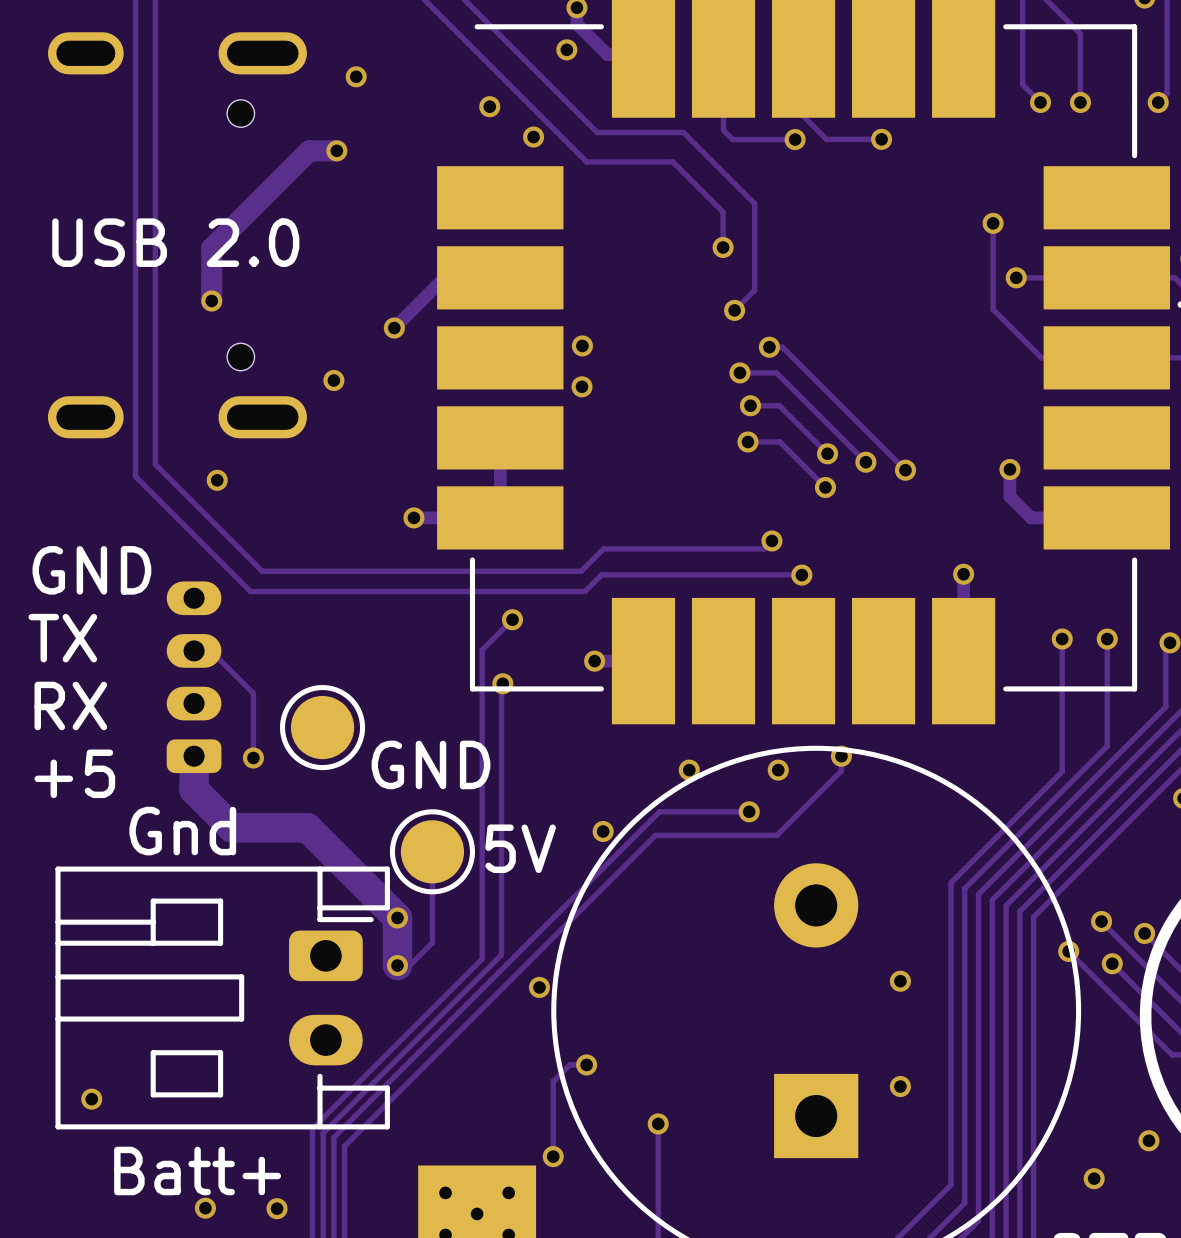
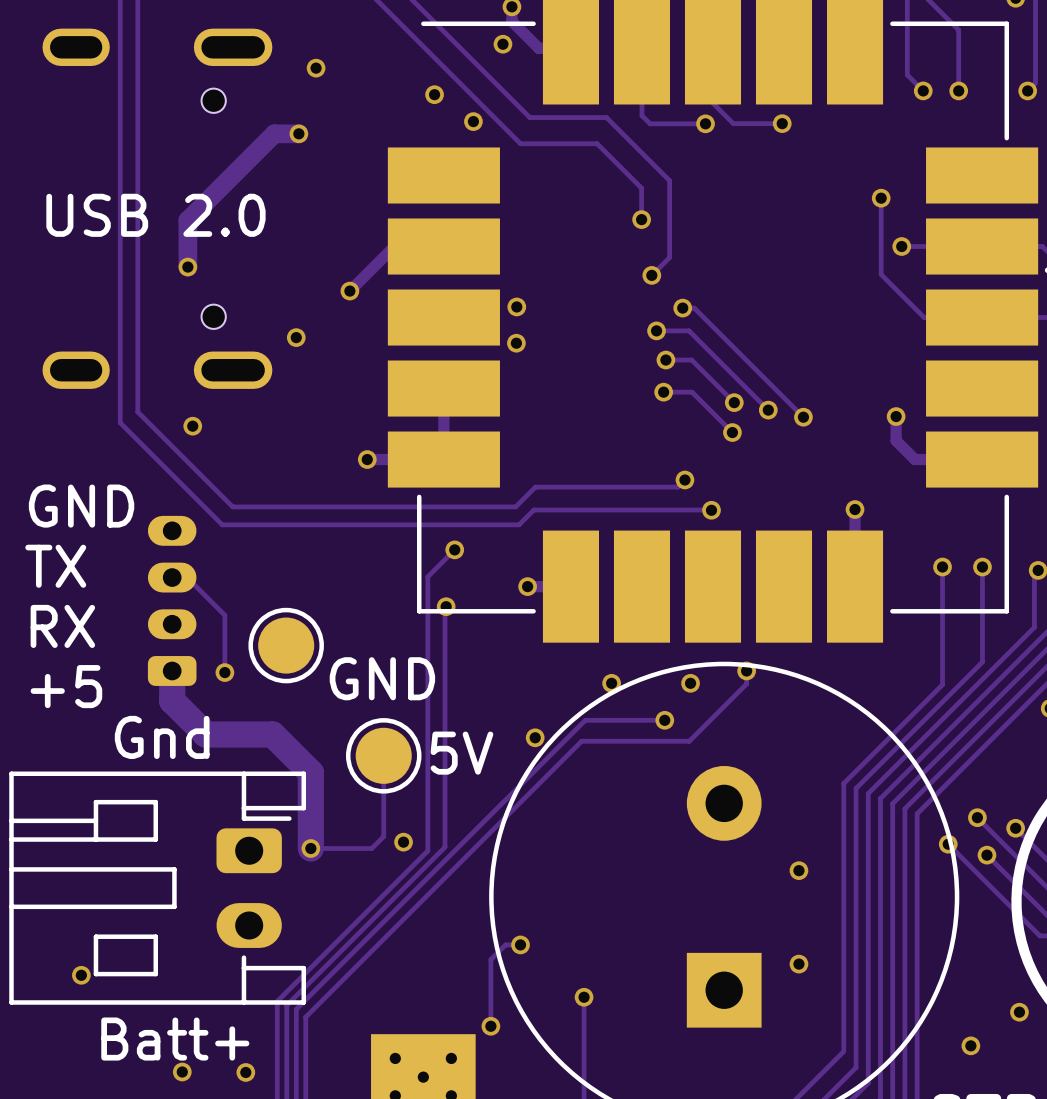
track: (350, 870) (397, 917) (397, 965) (409, 965) (418, 956) -> (310, 772) (310, 848) (371, 848)
via: (397, 917) -> none
via: none -> (403, 842)
via: none -> (310, 848)
via: (397, 965) -> none
via: (539, 987) -> none
part position: (222, 997) -> (157, 888)

